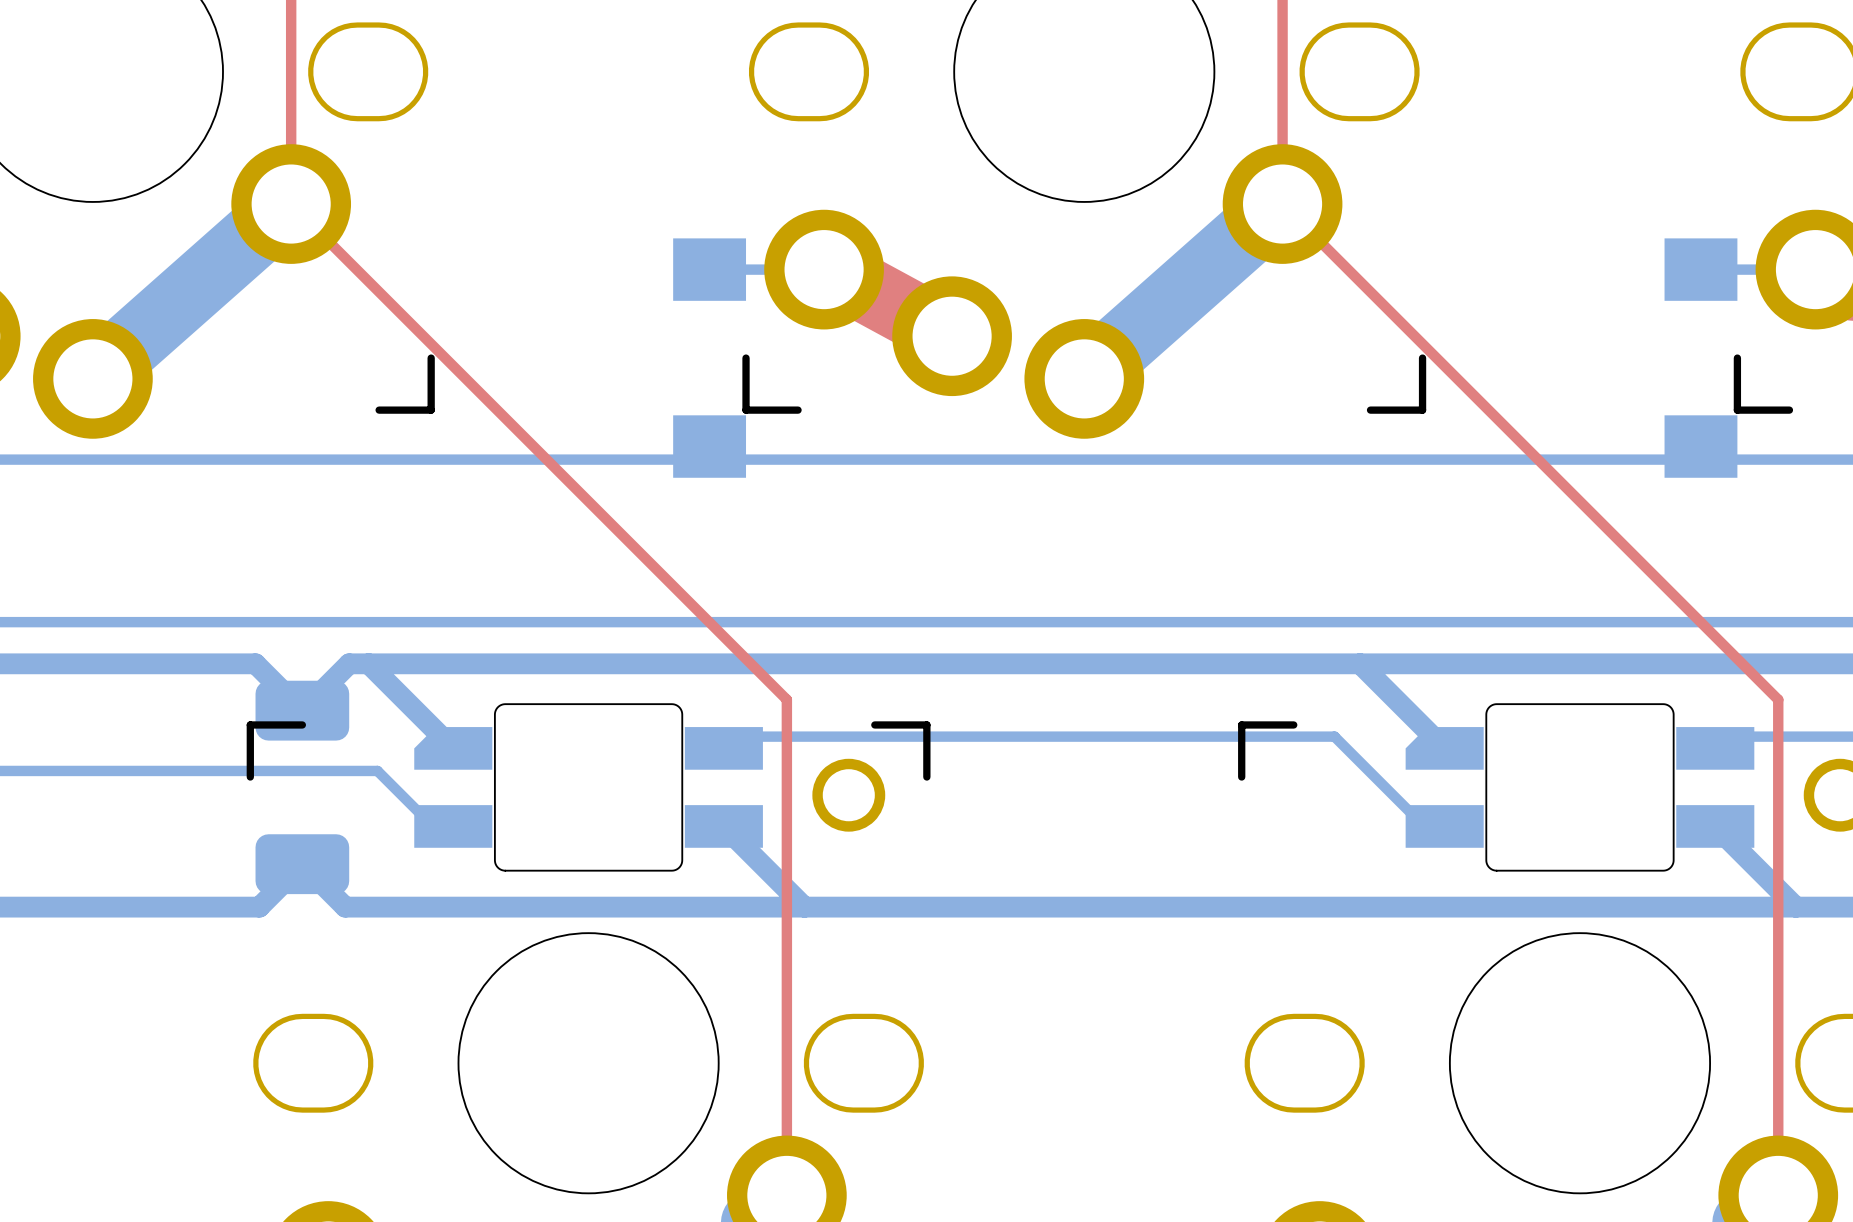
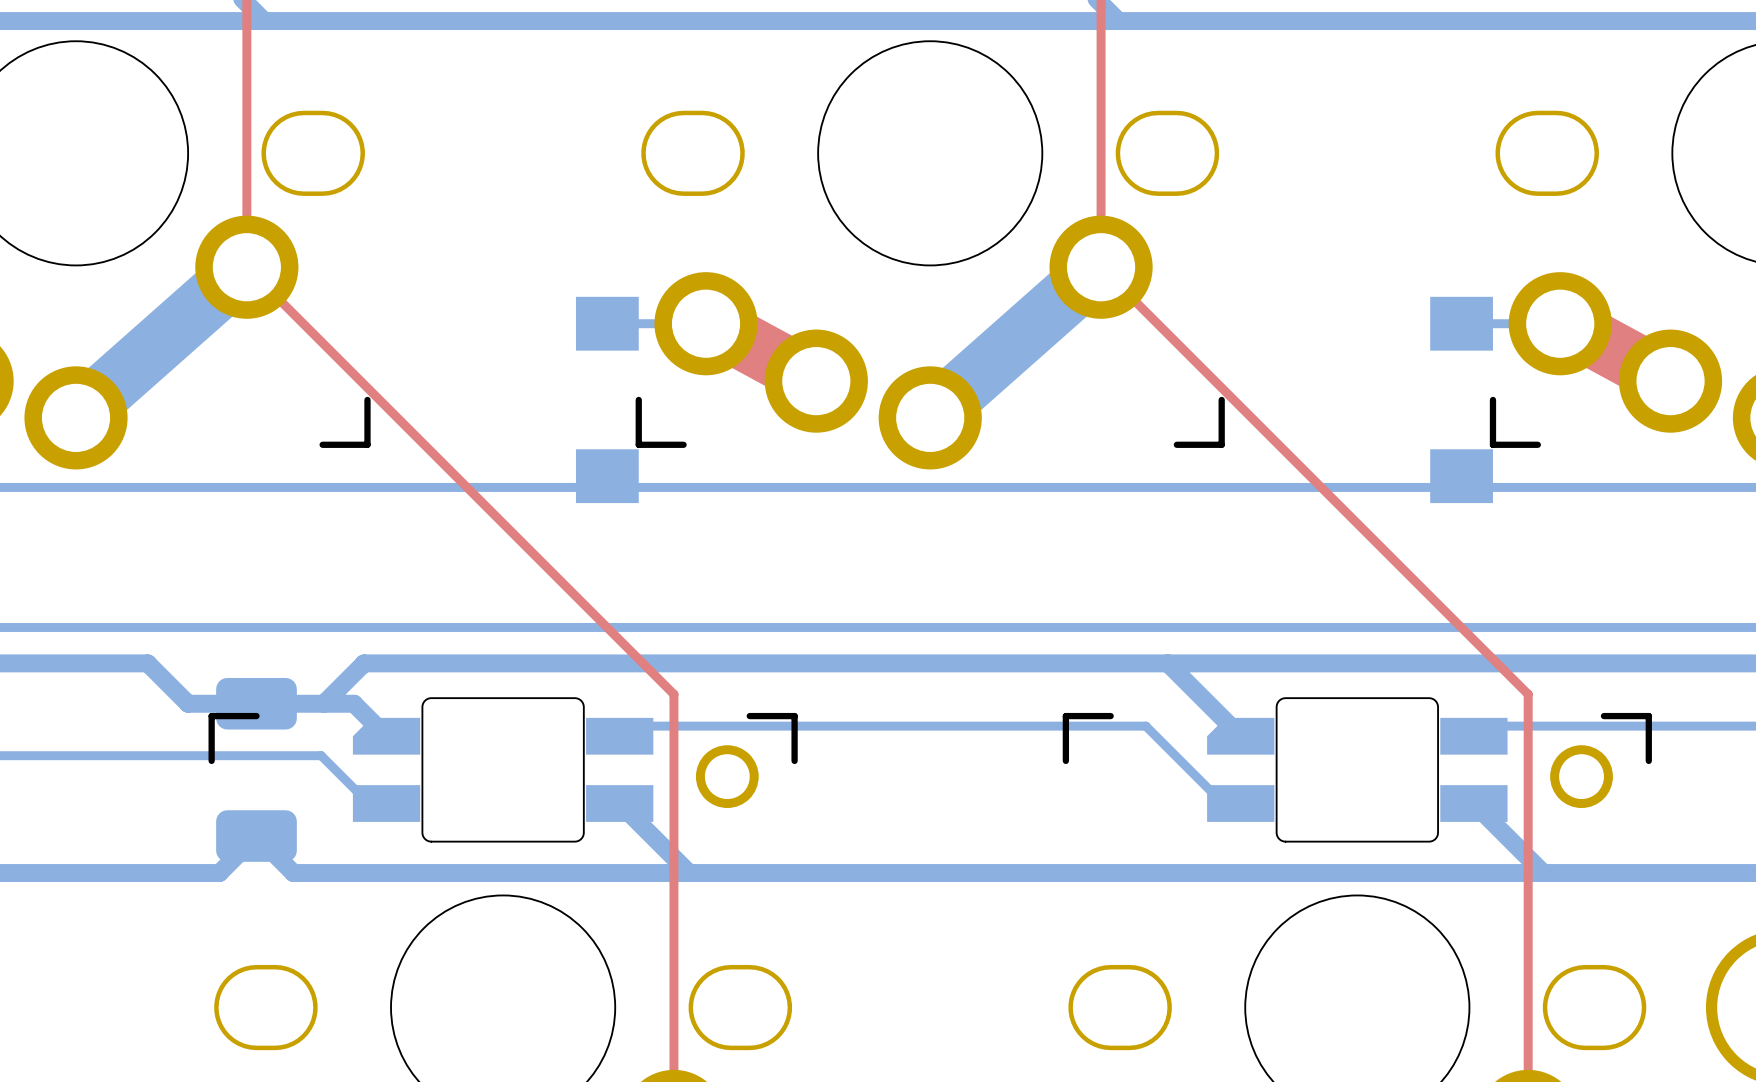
bottom track: (176, 663) (255, 663) (302, 710) (349, 663) (427, 663) -> (147, 663) (188, 703) (354, 703)
bottom track: (368, 663) (415, 710) -> none
bottom track: none -> (364, 663) (323, 703)

